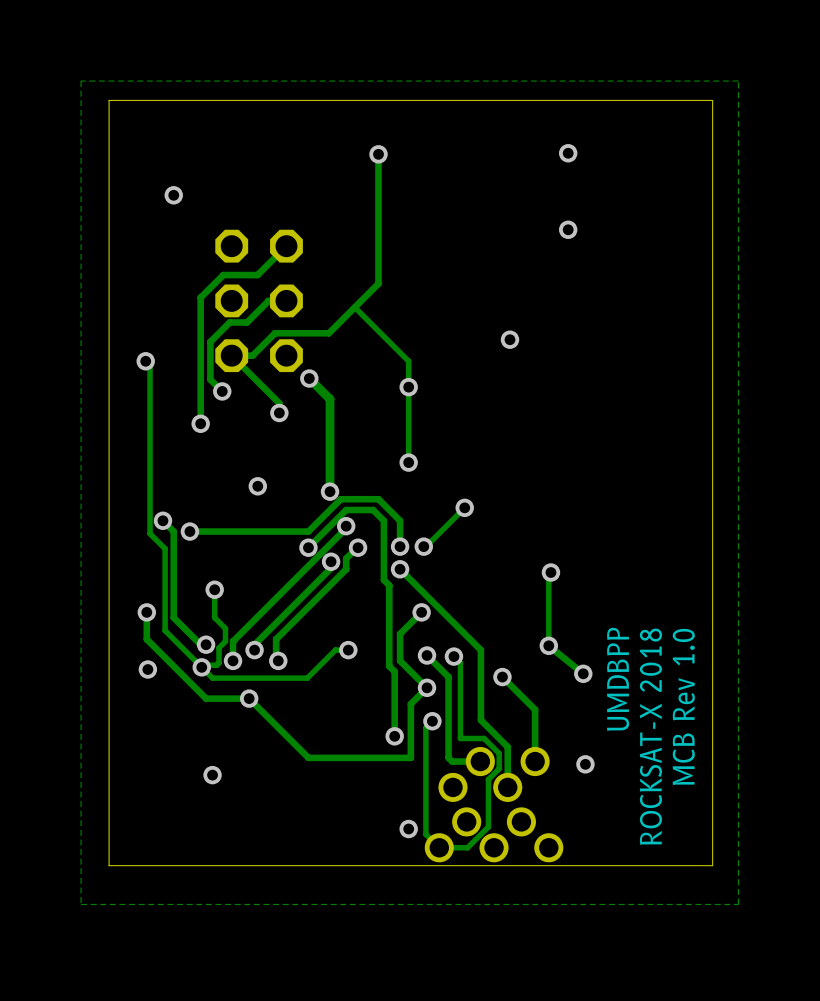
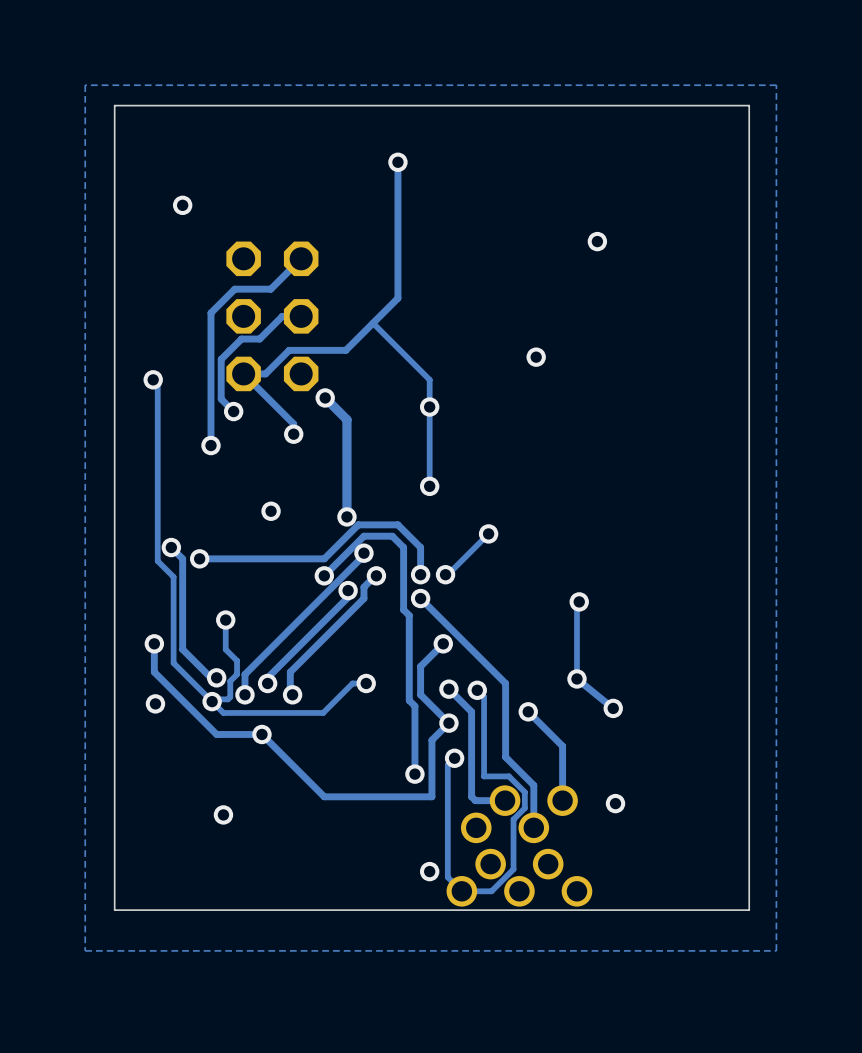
via: (568, 153) -> none
text: UMDBPP (618, 679) -> none
text: MCB Rev 1.0 (683, 706) -> none
text: ROCKSAT-X 2018 (650, 736) -> none

